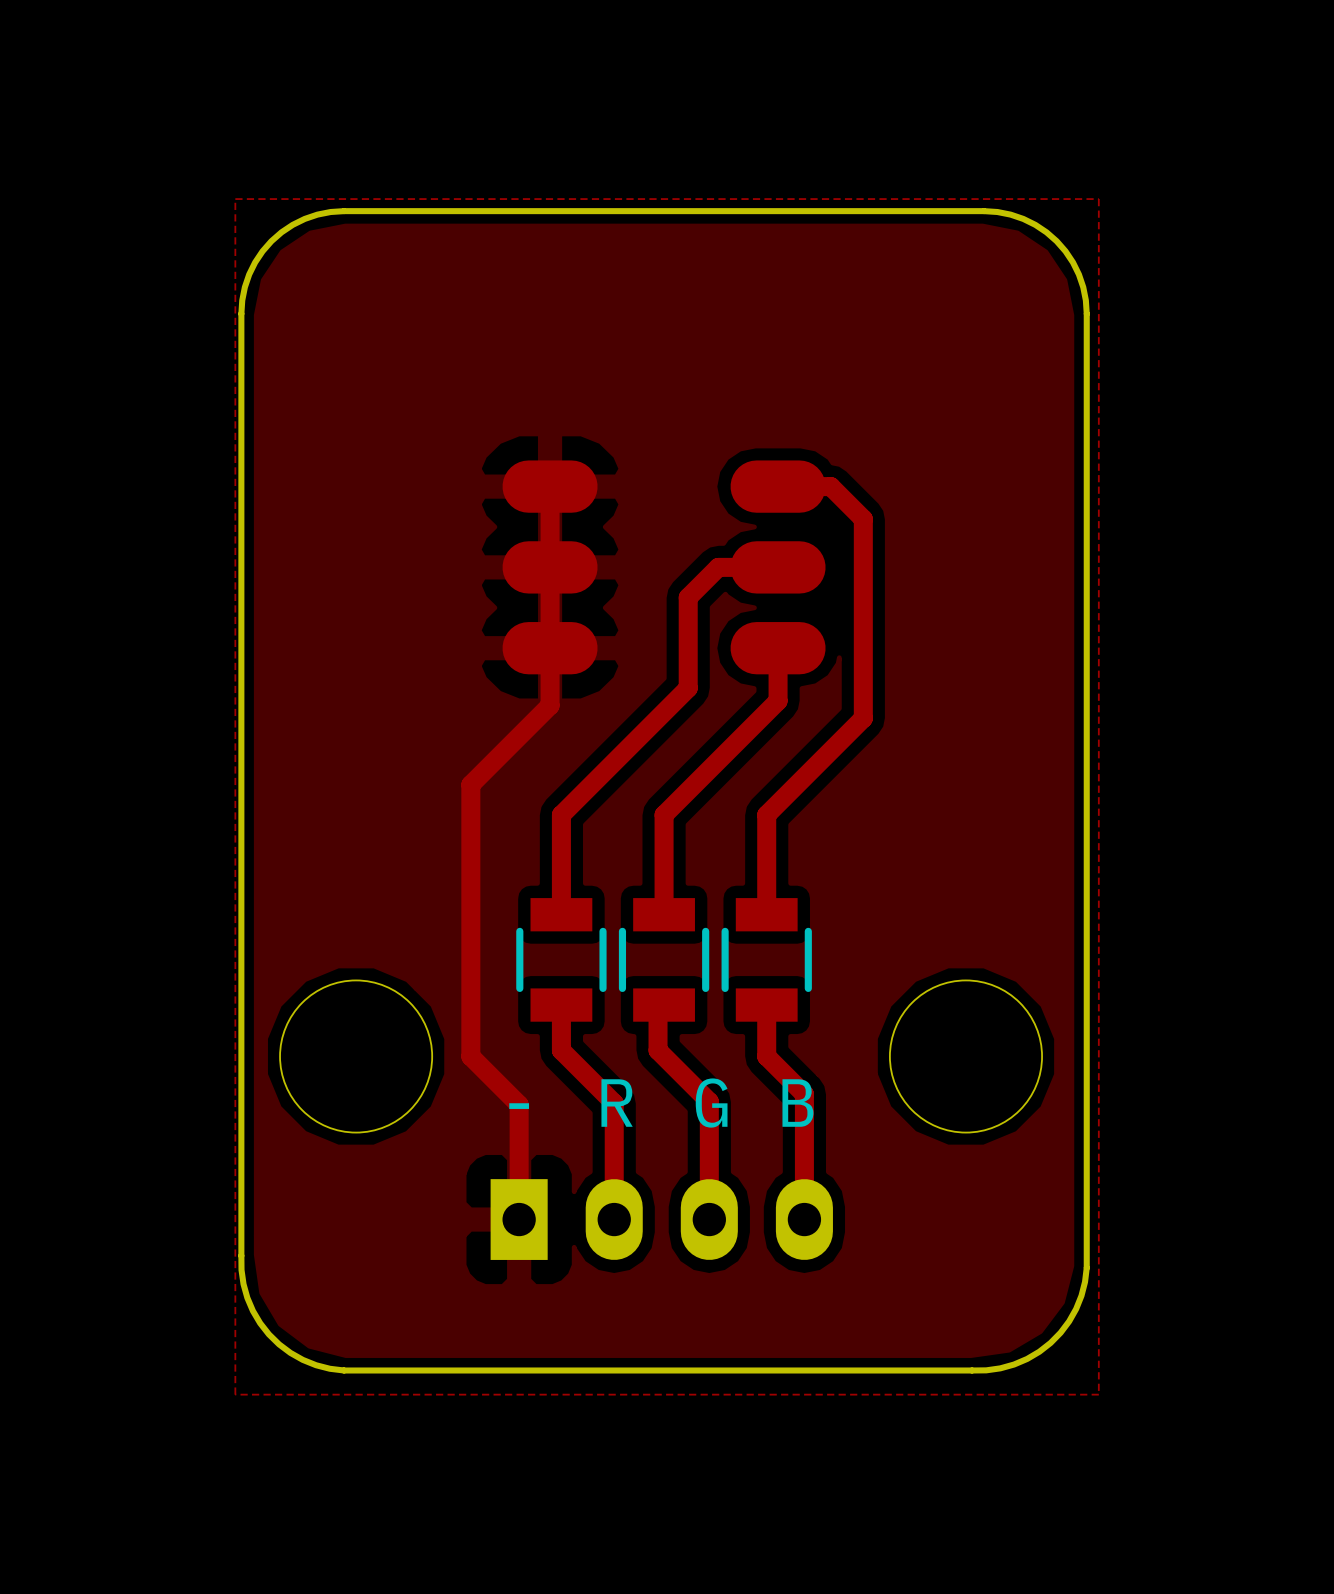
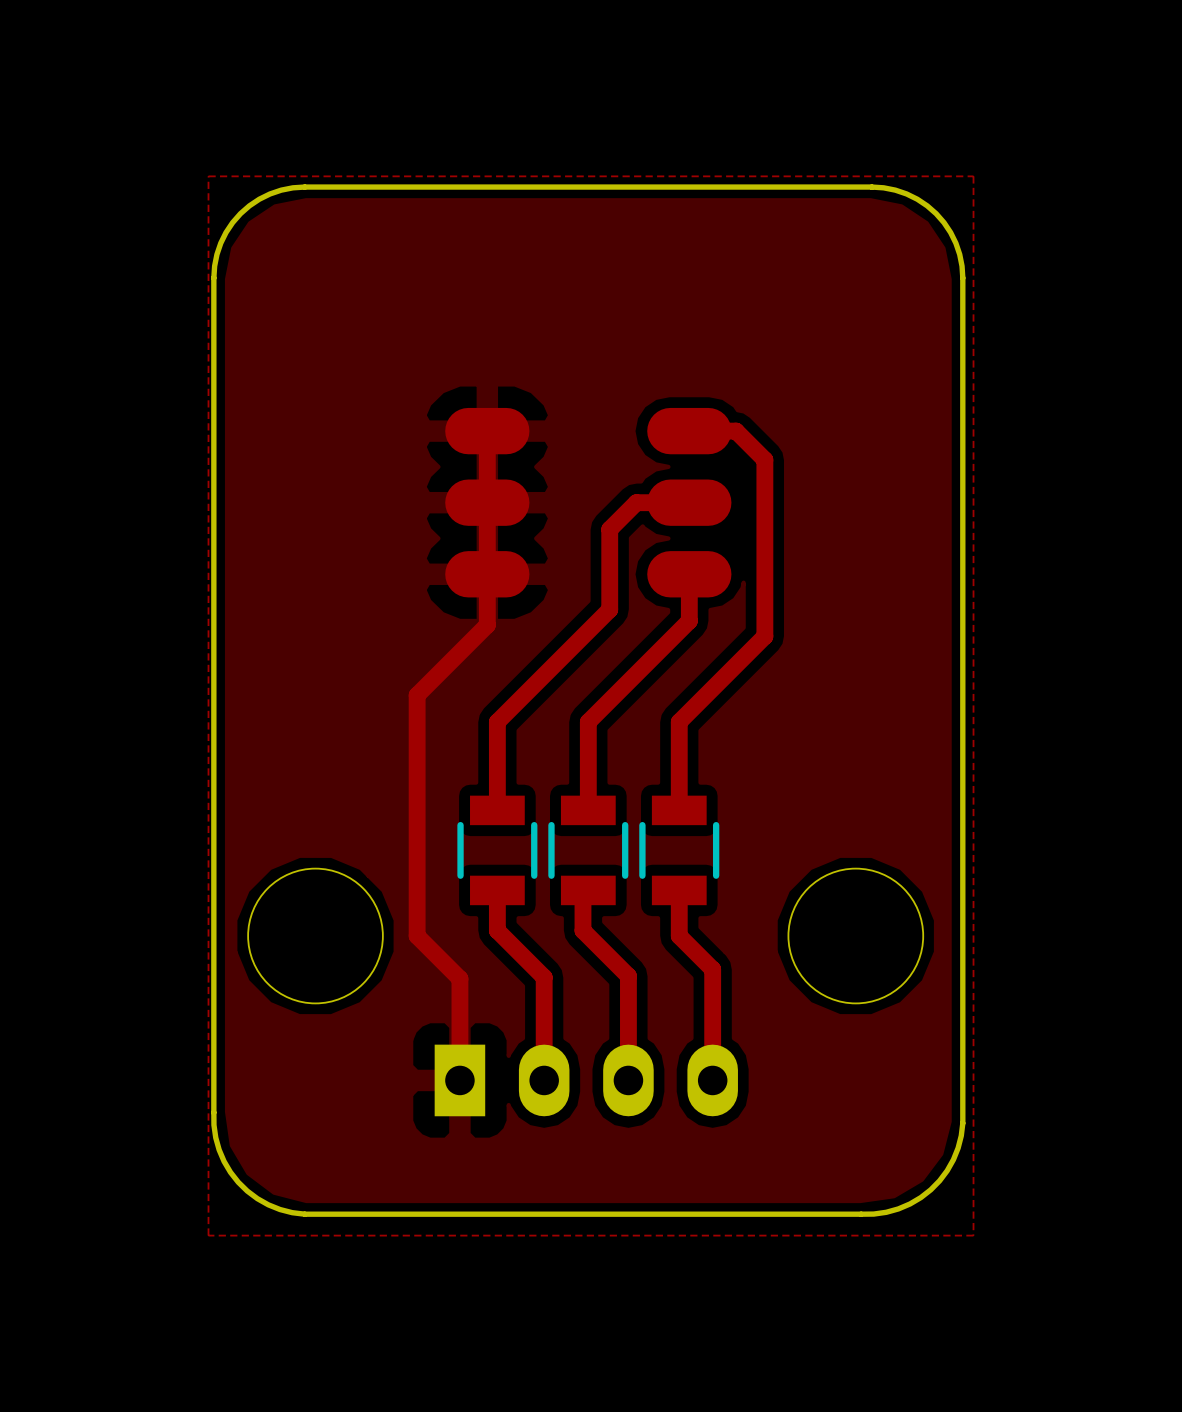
text: R (617, 1103) -> none
text: G (711, 1103) -> none
text: B (797, 1103) -> none
text: - (519, 1106) -> none

